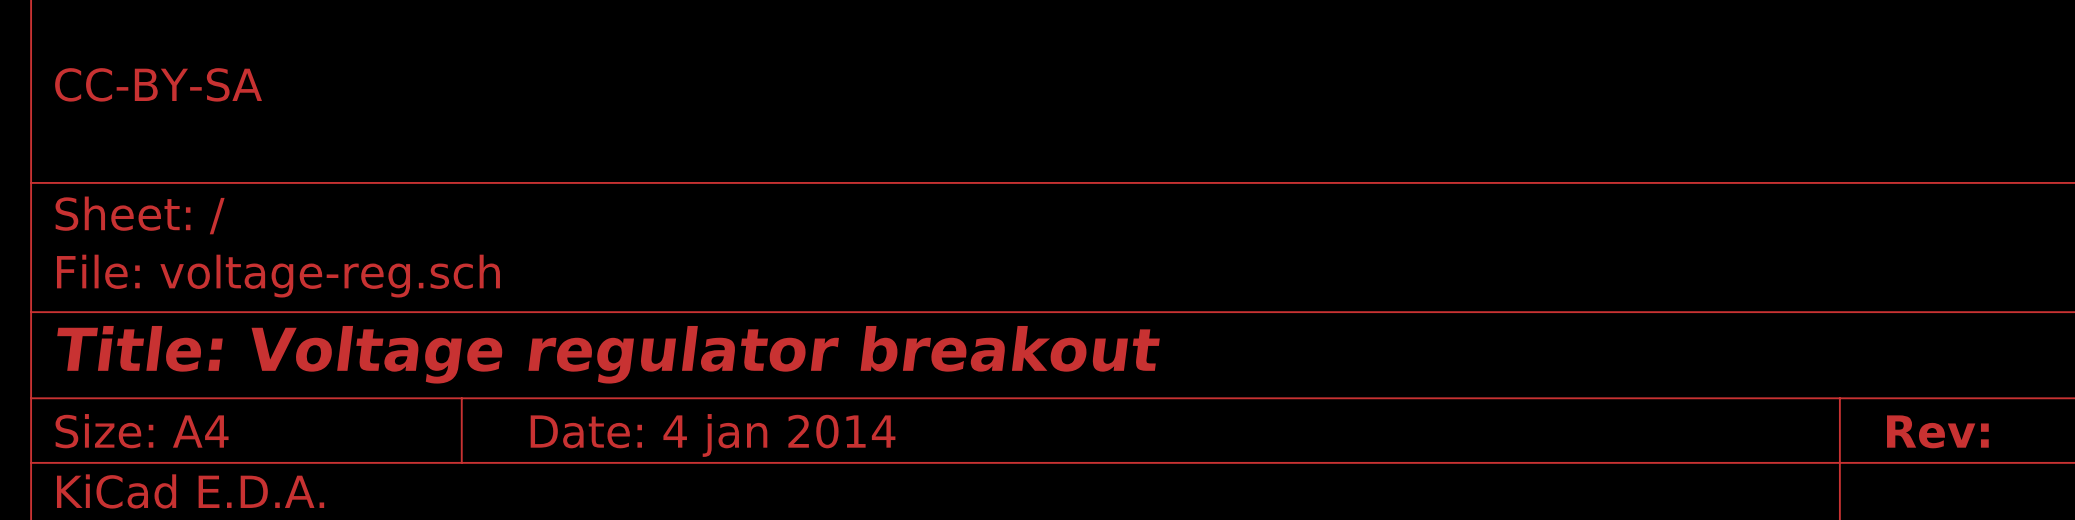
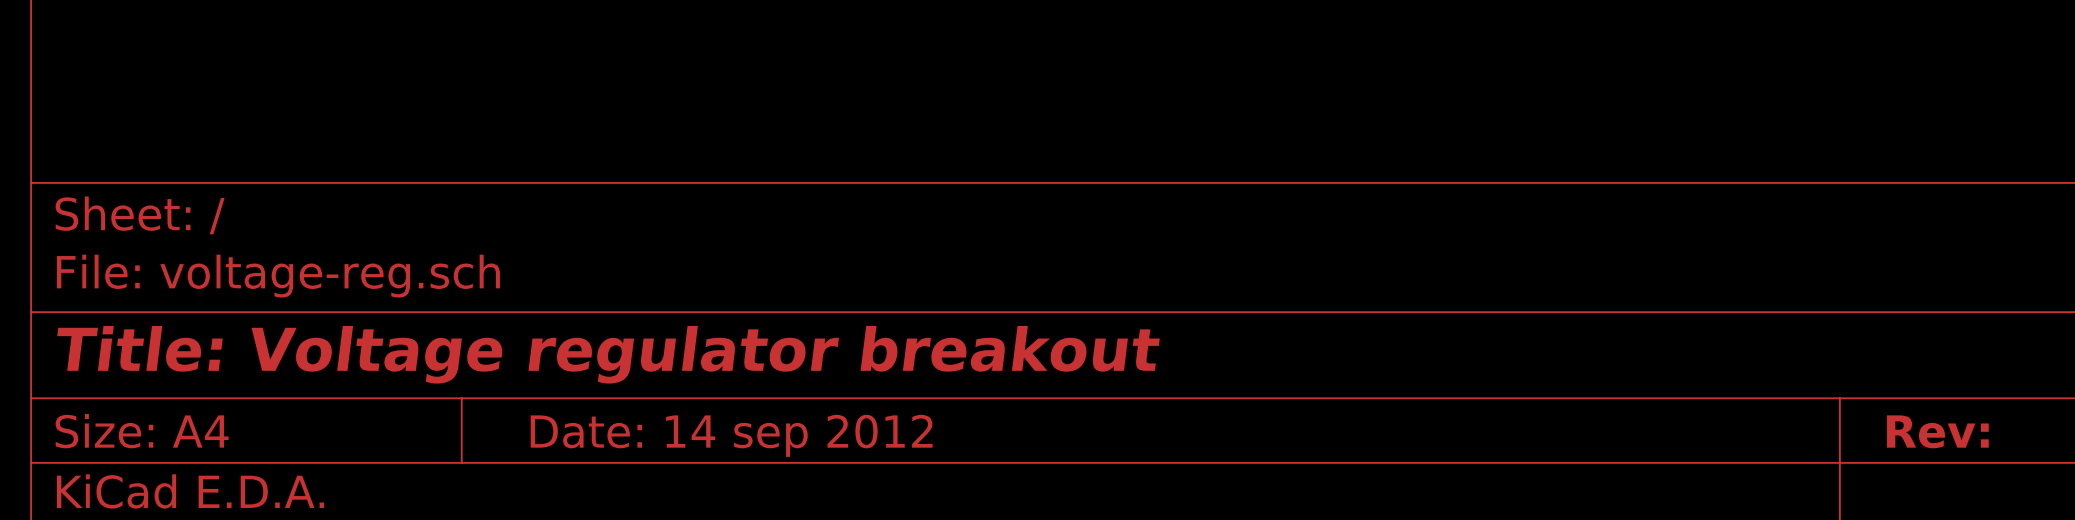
title block: CC-BY-SA (158, 84) -> none
title block: Date: 4 jan 2014 (713, 435) -> Date: 14 sep 2012 (731, 435)

